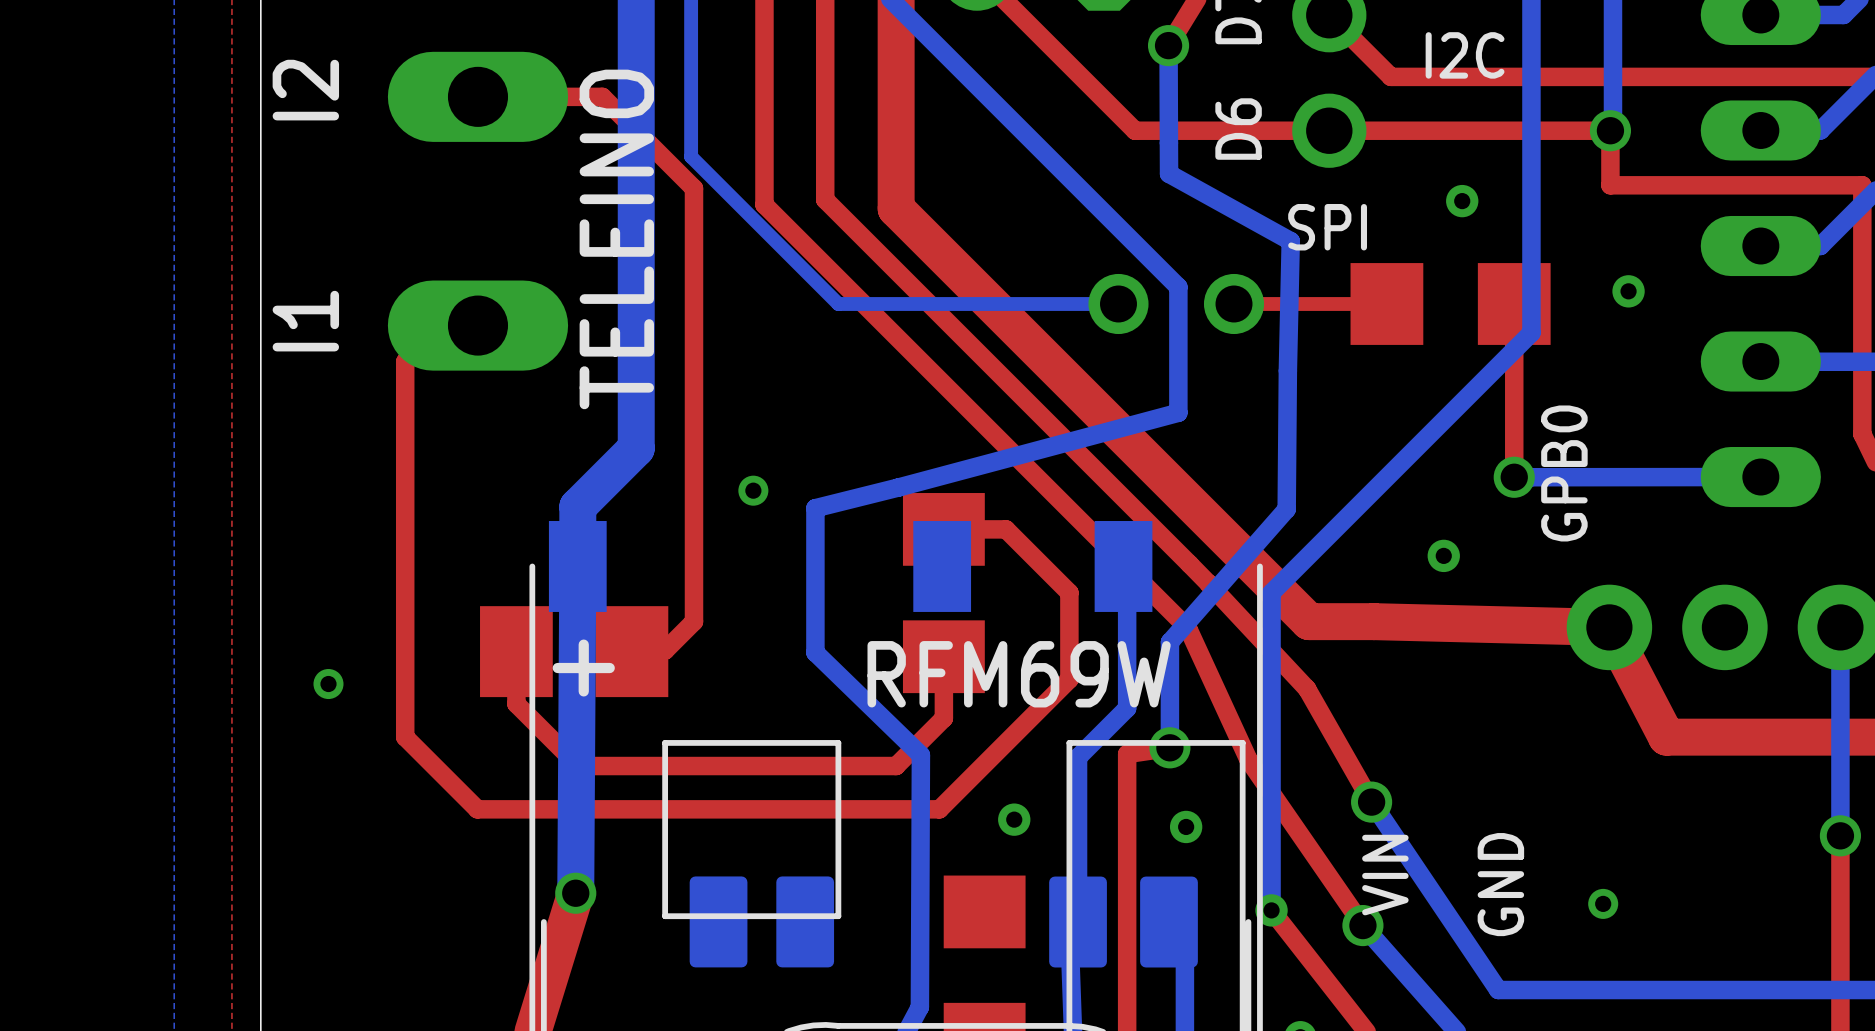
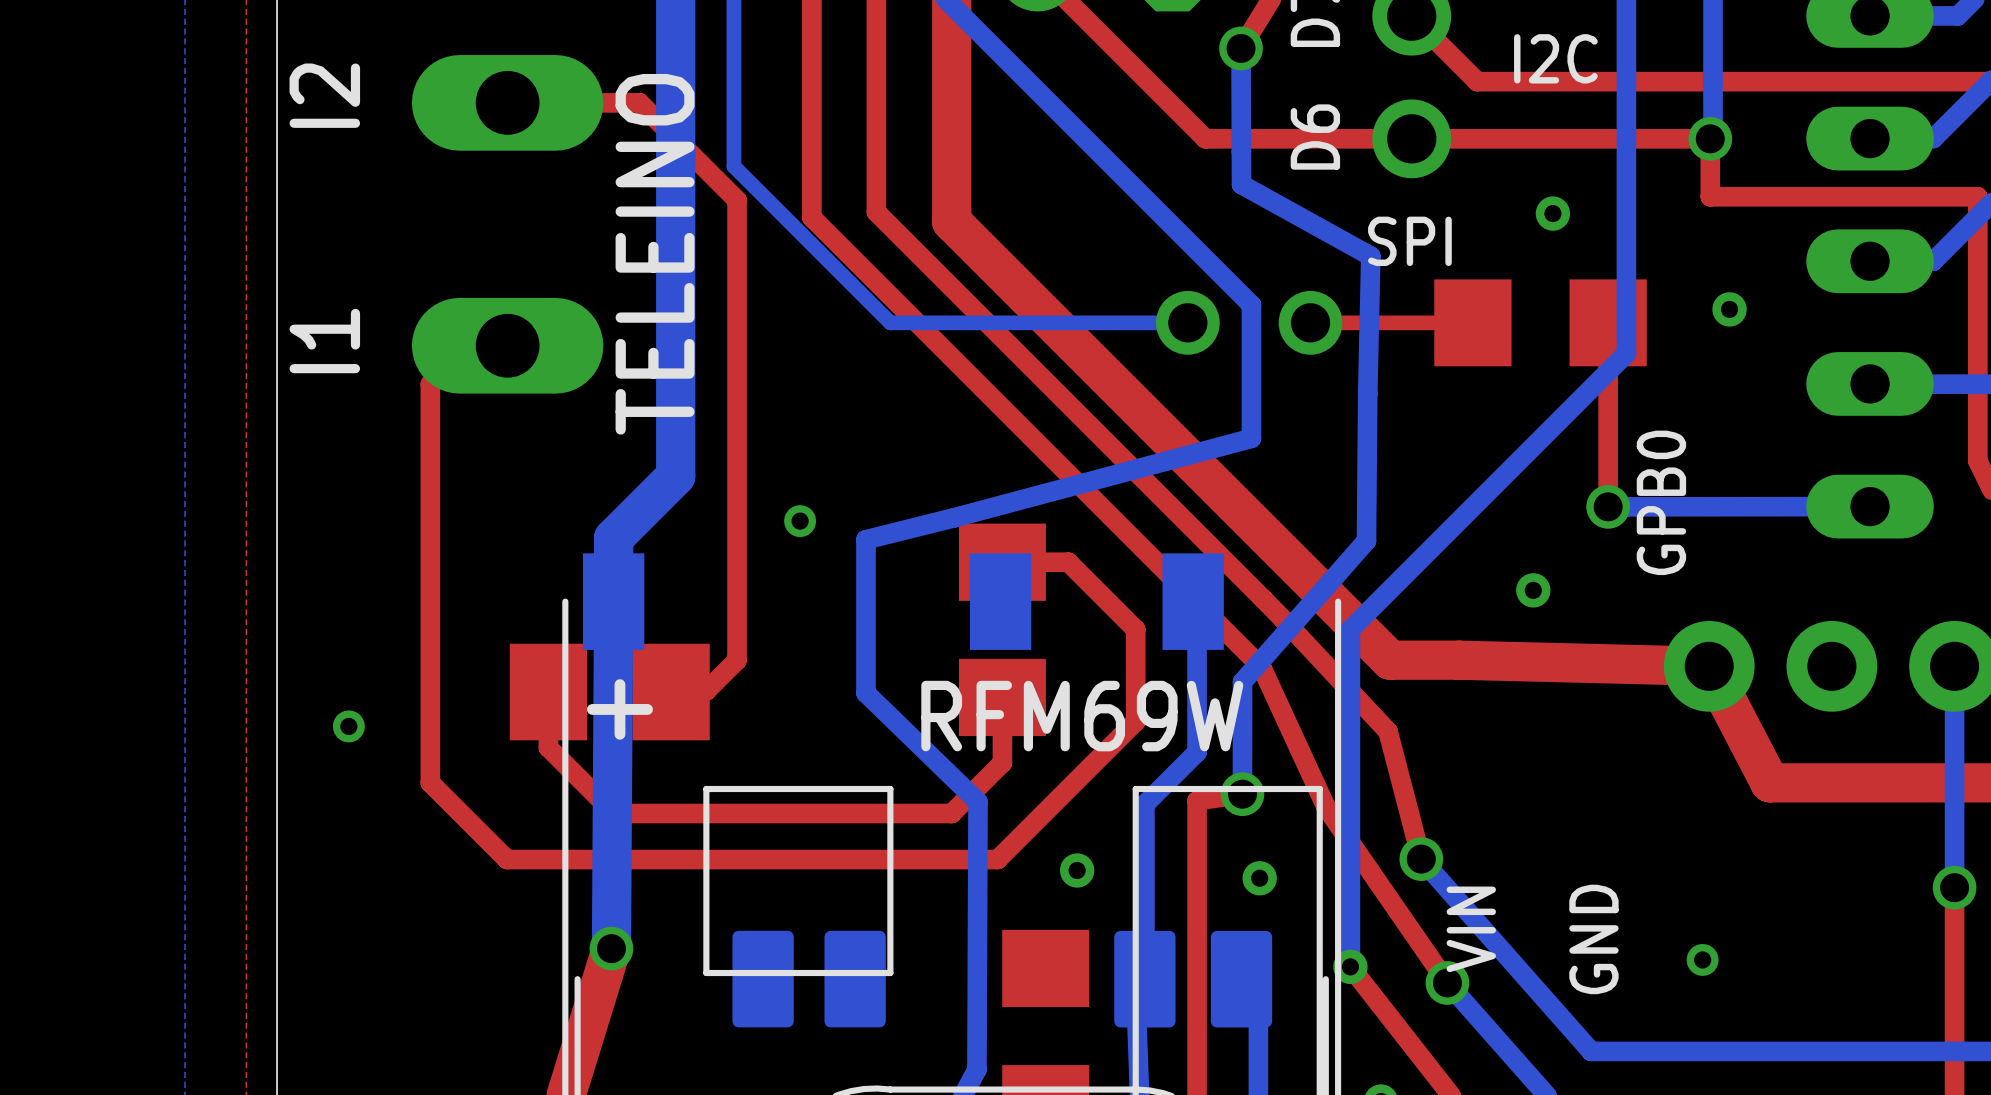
top track: (1307, 688) (1371, 802) -> (1388, 731) (1421, 859)
bottom track: (1371, 802) (1498, 990) -> (1421, 859) (1591, 1051)
via position: (1371, 802) -> (1421, 859)

